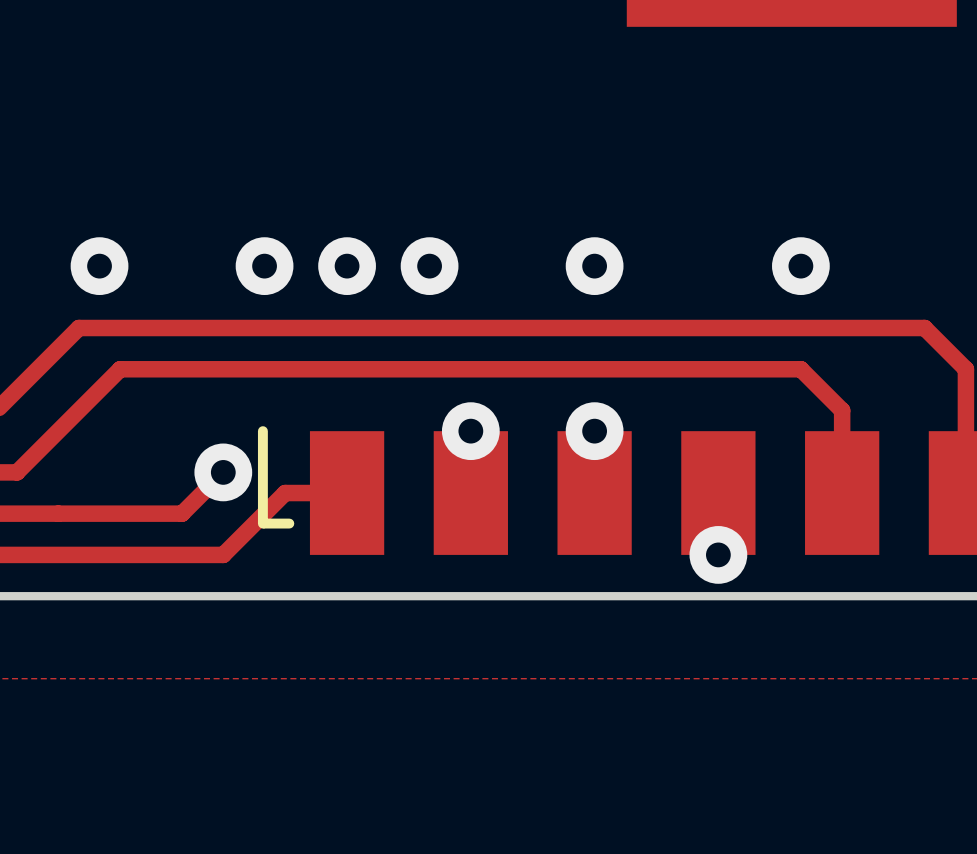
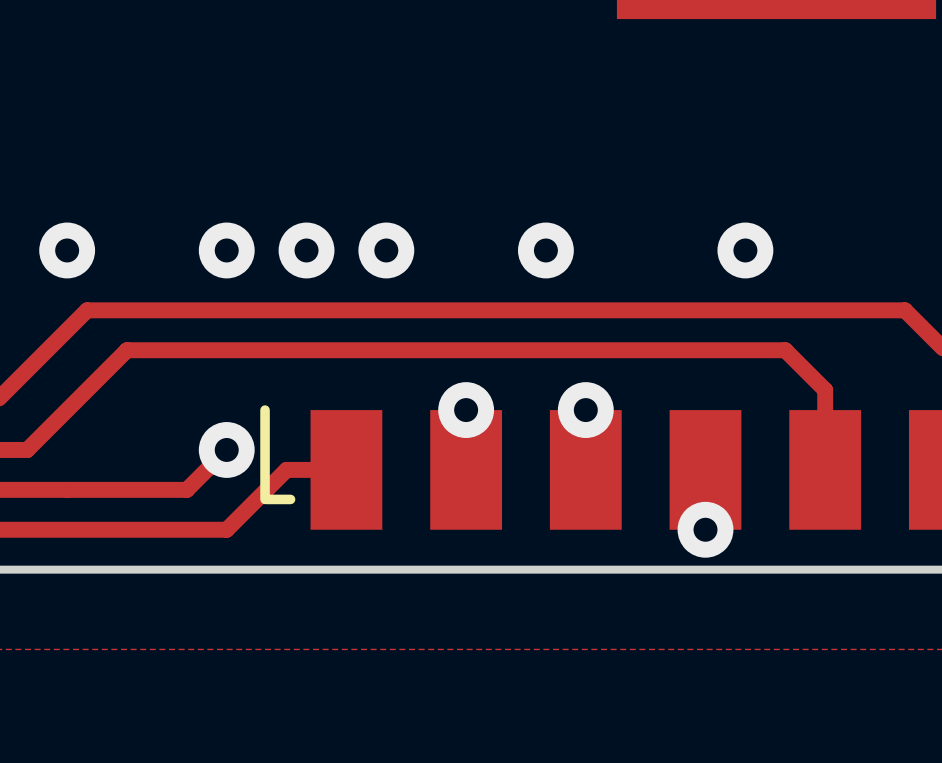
via position: (99, 266) -> (67, 250)
via: none -> (226, 250)
via: (264, 266) -> none
via: none -> (306, 250)
via: (347, 266) -> none
via: none -> (386, 250)
via: (429, 266) -> none
via position: (594, 266) -> (545, 250)
via position: (800, 266) -> (745, 250)

